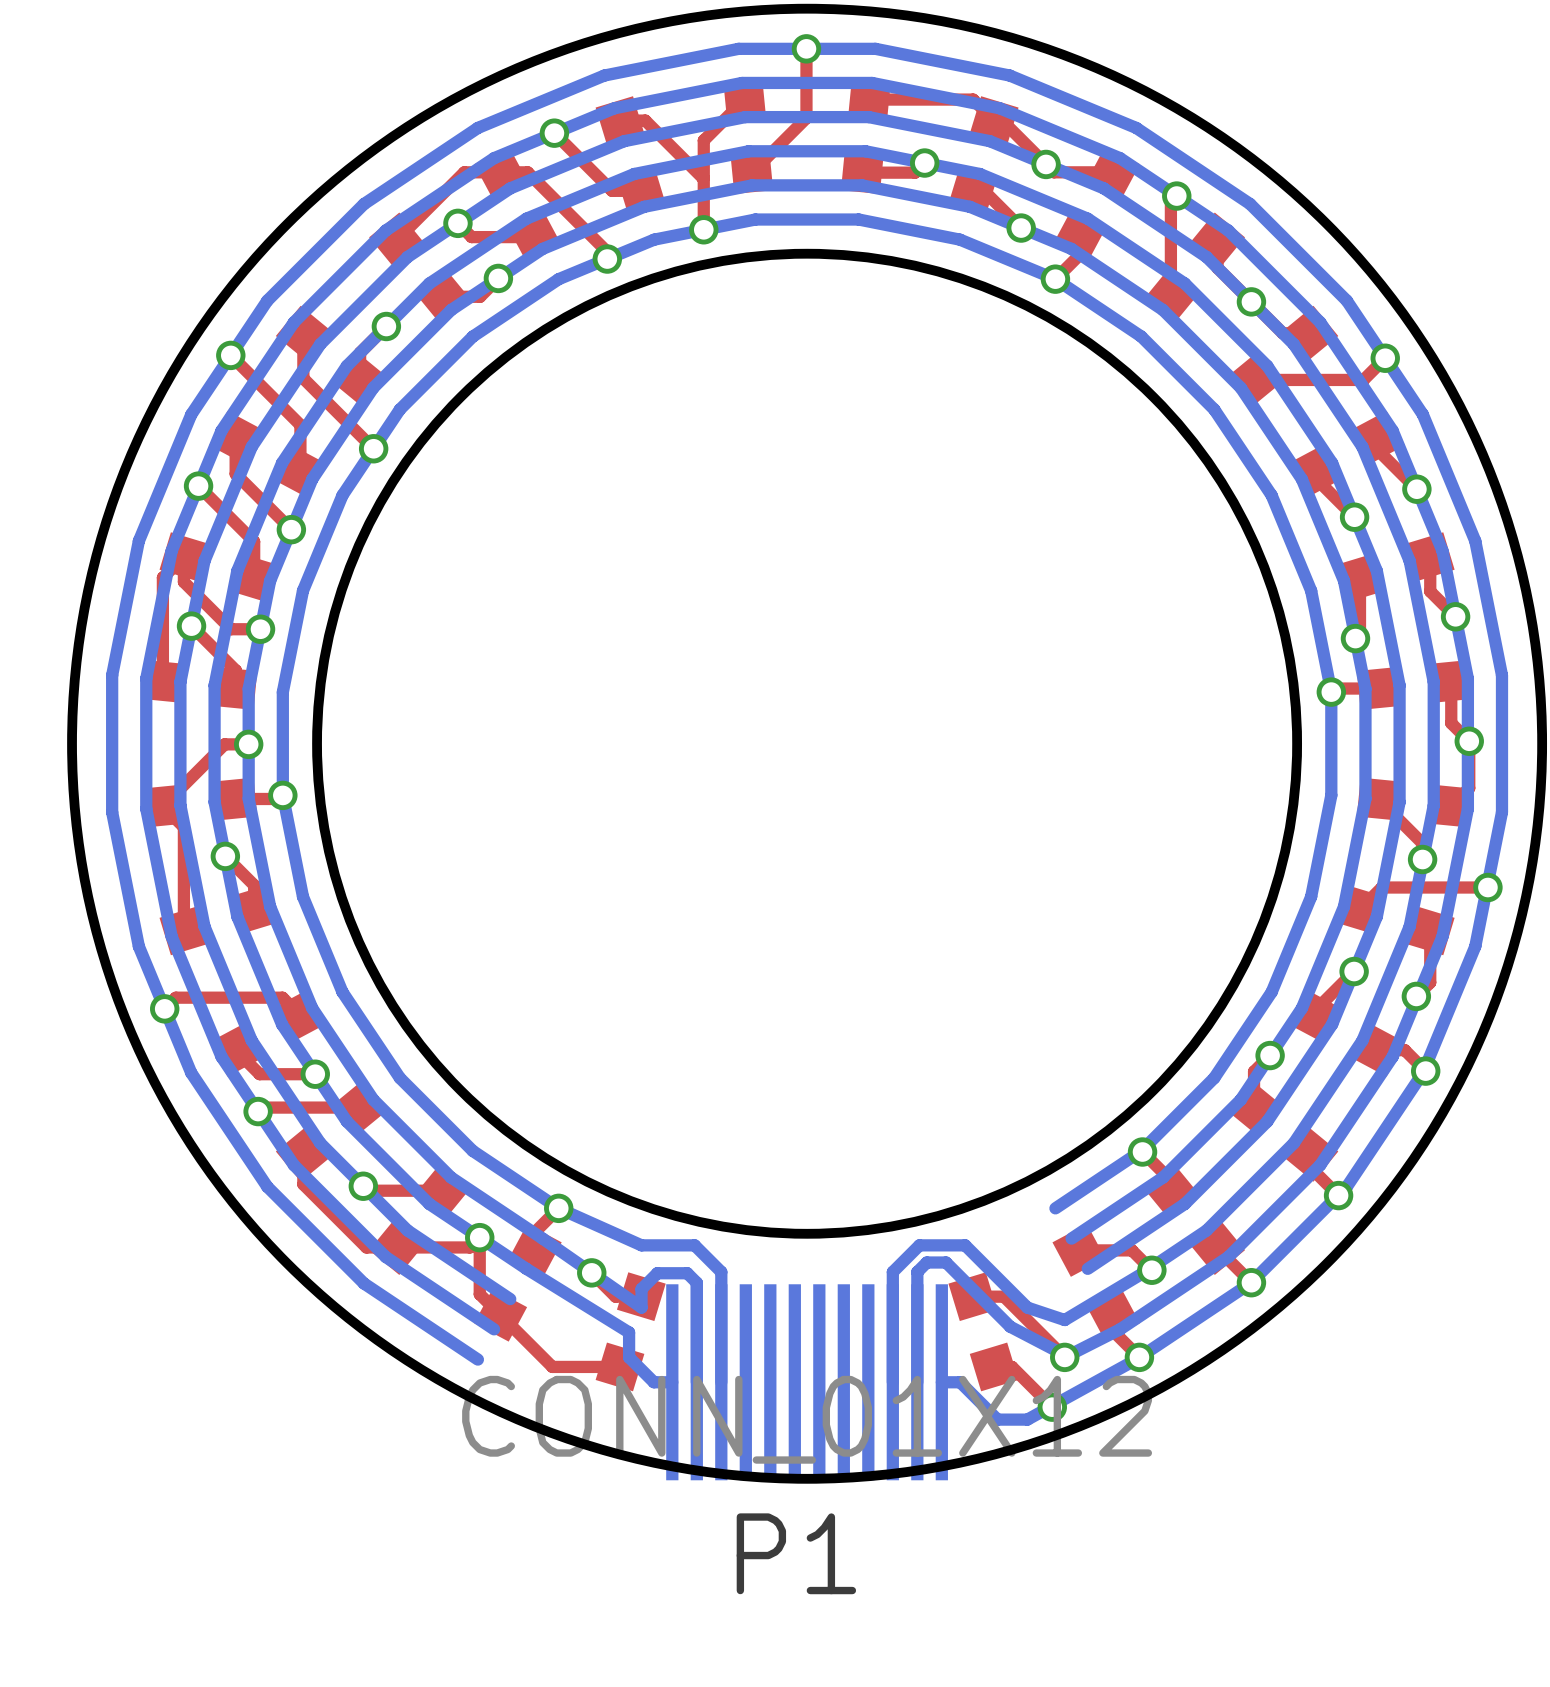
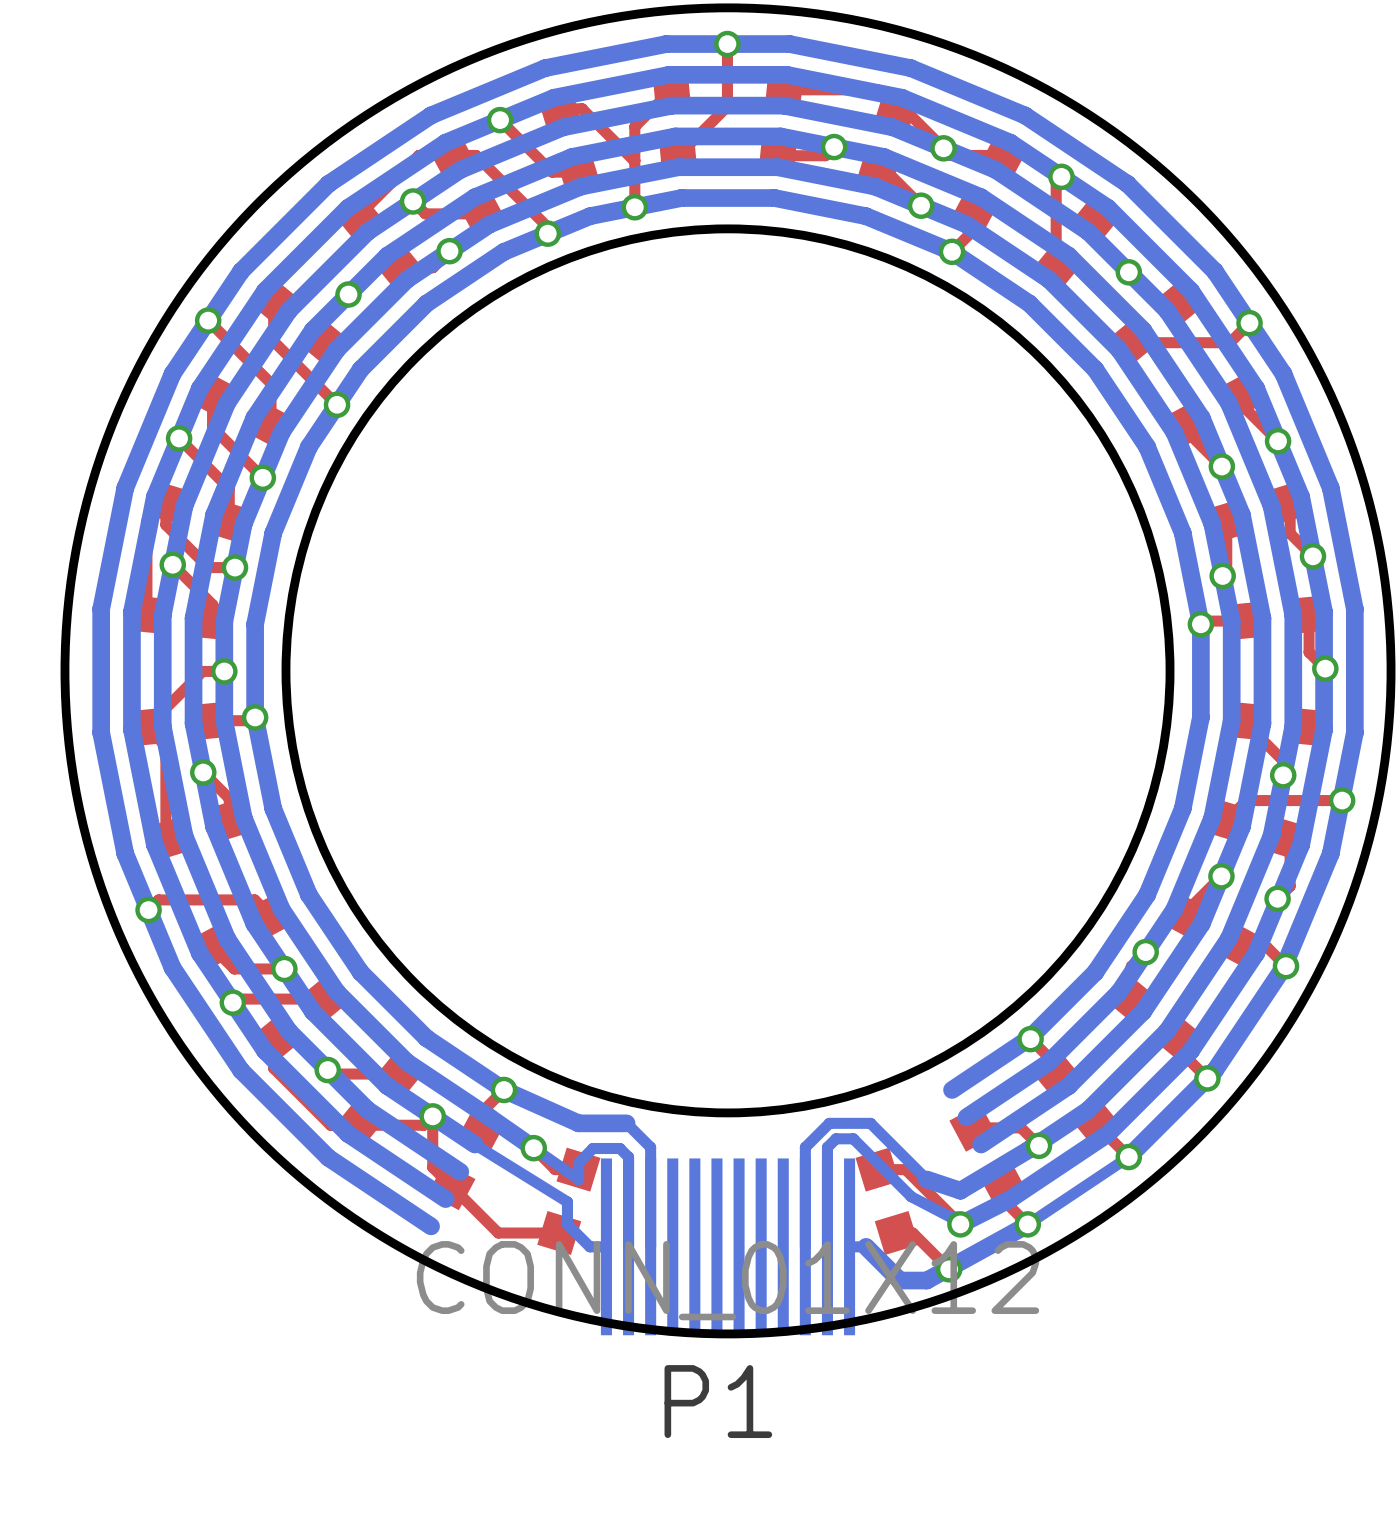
bottom track width: thin (1055, 1208) (1141, 1150) (1214, 1077) (1271, 992) (1311, 896) (1331, 795) (1331, 692) (1311, 590) (1271, 495) (1214, 409) (1141, 336) (1055, 279) (960, 239) (858, 219) (755, 219) (654, 239) (558, 279) (472, 336) (399, 409) (342, 495) (302, 590) (282, 692) (282, 795) (302, 896) (342, 992) (399, 1077) (472, 1150) (558, 1208) (641, 1245) (694, 1245) -> thick (952, 1089) (1029, 1038) (1095, 972) (1147, 894) (1182, 808) (1200, 717) (1200, 624) (1182, 532) (1147, 446) (1095, 369) (1029, 303) (952, 251) (865, 216) (774, 198) (681, 198) (590, 216) (503, 251) (426, 303) (360, 369) (308, 446) (273, 532) (255, 624) (255, 717) (273, 808) (308, 894) (360, 972) (426, 1038) (503, 1089) (578, 1123) (626, 1123)
bottom track width: thin (1071, 1238) (1163, 1177) (1240, 1099) (1301, 1008) (1344, 906) (1365, 798) (1365, 688) (1344, 580) (1301, 479) (1240, 387) (1163, 310) (1071, 248) (969, 206) (862, 185) (752, 185) (644, 206) (542, 248) (451, 310) (373, 387) (312, 479) (270, 580) (248, 688) (248, 798) (270, 906) (312, 1008) (373, 1099) (451, 1177) (591, 1272) -> thick (966, 1117) (1049, 1062) (1119, 991) (1174, 909) (1212, 817) (1231, 720) (1231, 621) (1212, 523) (1174, 432) (1119, 349) (1049, 279) (966, 224) (874, 186) (777, 167) (678, 167) (581, 186) (489, 224) (406, 279) (336, 349) (281, 432) (243, 523) (224, 621) (224, 720) (243, 817) (281, 909) (336, 991) (406, 1062) (533, 1148)
bottom track width: thin (1087, 1268) (1184, 1204) (1267, 1121) (1332, 1024) (1376, 916) (1399, 802) (1399, 685) (1376, 570) (1332, 463) (1267, 366) (1184, 283) (1087, 218) (979, 173) (865, 151) (748, 151) (634, 173) (526, 218) (429, 283) (346, 366) (282, 463) (237, 570) (214, 685) (214, 802) (237, 916) (282, 1024) (346, 1121) (429, 1204) (526, 1268) -> thick (981, 1144) (1068, 1086) (1143, 1011) (1201, 924) (1241, 826) (1262, 723) (1262, 618) (1241, 514) (1201, 417) (1143, 330) (1068, 255) (981, 197) (883, 156) (780, 136) (675, 136) (572, 156) (474, 197) (387, 255) (312, 330) (254, 417) (214, 514) (193, 618) (193, 723) (214, 826) (254, 924) (312, 1011) (387, 1086) (474, 1144)
bottom track width: thin (1250, 1283) (1346, 1186) (1422, 1072) (1475, 946) (1501, 812) (1501, 675) (1475, 541) (1422, 414) (1346, 300) (1250, 203) (1136, 127) (1009, 75) (875, 48) (738, 48) (604, 75) (477, 127) (364, 203) (267, 300) (191, 414) (138, 541) (112, 675) (112, 812) (138, 946) (191, 1072) (267, 1186) (364, 1283) (477, 1359) -> thick (1127, 1157) (1214, 1070) (1283, 967) (1330, 853) (1354, 732) (1354, 609) (1330, 488) (1283, 373) (1214, 271) (1127, 184) (1024, 115) (910, 68) (789, 44) (666, 44) (545, 68) (431, 115) (328, 184) (241, 271) (172, 373) (125, 488) (101, 609) (101, 732) (125, 853) (172, 967) (241, 1070) (328, 1157) (431, 1226)
bottom track width: thin (510, 1299) (407, 1230) (320, 1143) (251, 1040) (204, 926) (180, 805) (180, 682) (204, 560) (251, 446) (320, 344) (407, 257) (510, 188) (624, 141) (745, 117) (868, 117) (989, 141) (1103, 188) (1206, 257) (1293, 344) (1362, 446) (1409, 560) (1433, 682) (1433, 805) (1409, 926) (1362, 1040) (1293, 1143) (1206, 1230) (1141, 1274) (1064, 1320) (1027, 1307) -> thick (460, 1171) (367, 1109) (288, 1031) (227, 938) (184, 835) (162, 726) (162, 615) (184, 506) (227, 403) (288, 310) (367, 231) (460, 169) (563, 127) (672, 105) (783, 105) (892, 127) (995, 169) (1088, 231) (1167, 310) (1228, 403) (1271, 506) (1293, 615) (1293, 726) (1271, 835) (1228, 938) (1167, 1031) (1088, 1109) (1029, 1149) (960, 1190) (926, 1179)
bottom track width: thin (494, 1329) (385, 1257) (293, 1164) (221, 1056) (171, 936) (146, 808) (146, 678) (171, 551) (221, 430) (293, 322) (385, 230) (494, 158) (614, 108) (742, 82) (872, 82) (999, 108) (1120, 158) (1228, 230) (1320, 322) (1392, 430) (1442, 551) (1467, 678) (1467, 808) (1442, 936) (1392, 1056) (1320, 1164) (1228, 1257) (1120, 1329) (1064, 1357) (1060, 1352) -> thick (445, 1199) (348, 1133) (265, 1050) (199, 953) (154, 844) (131, 729) (131, 612) (154, 497) (199, 388) (265, 290) (348, 207) (445, 142) (554, 97) (669, 74) (786, 74) (901, 97) (1010, 142) (1107, 207) (1190, 290) (1256, 388) (1301, 497) (1324, 612) (1324, 729) (1301, 844) (1256, 953) (1190, 1050) (1107, 1133) (1010, 1199) (960, 1224) (956, 1220)
bottom track width: thin (1136, 1359) (1027, 1419) (997, 1419) (960, 1382) -> thick (1024, 1226) (926, 1280) (899, 1280) (866, 1246)

